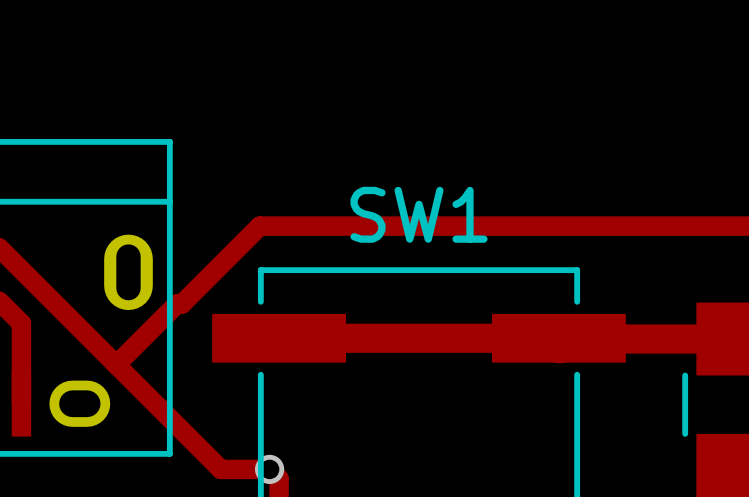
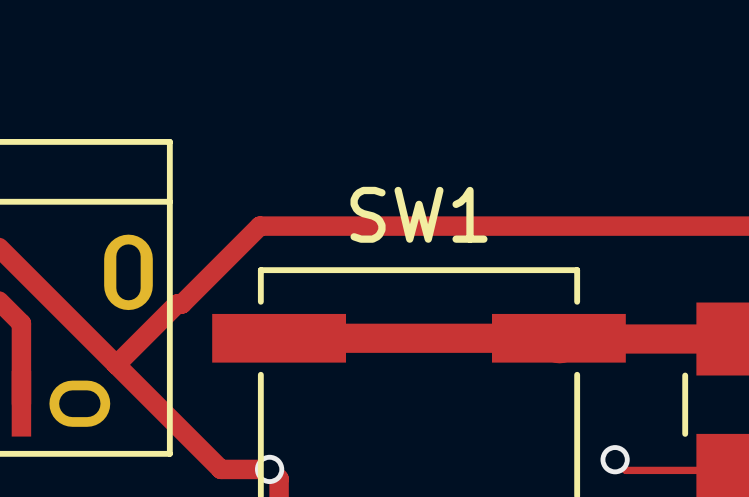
track: none -> (615, 459) (625, 470) (728, 470)
via: none -> (615, 459)

